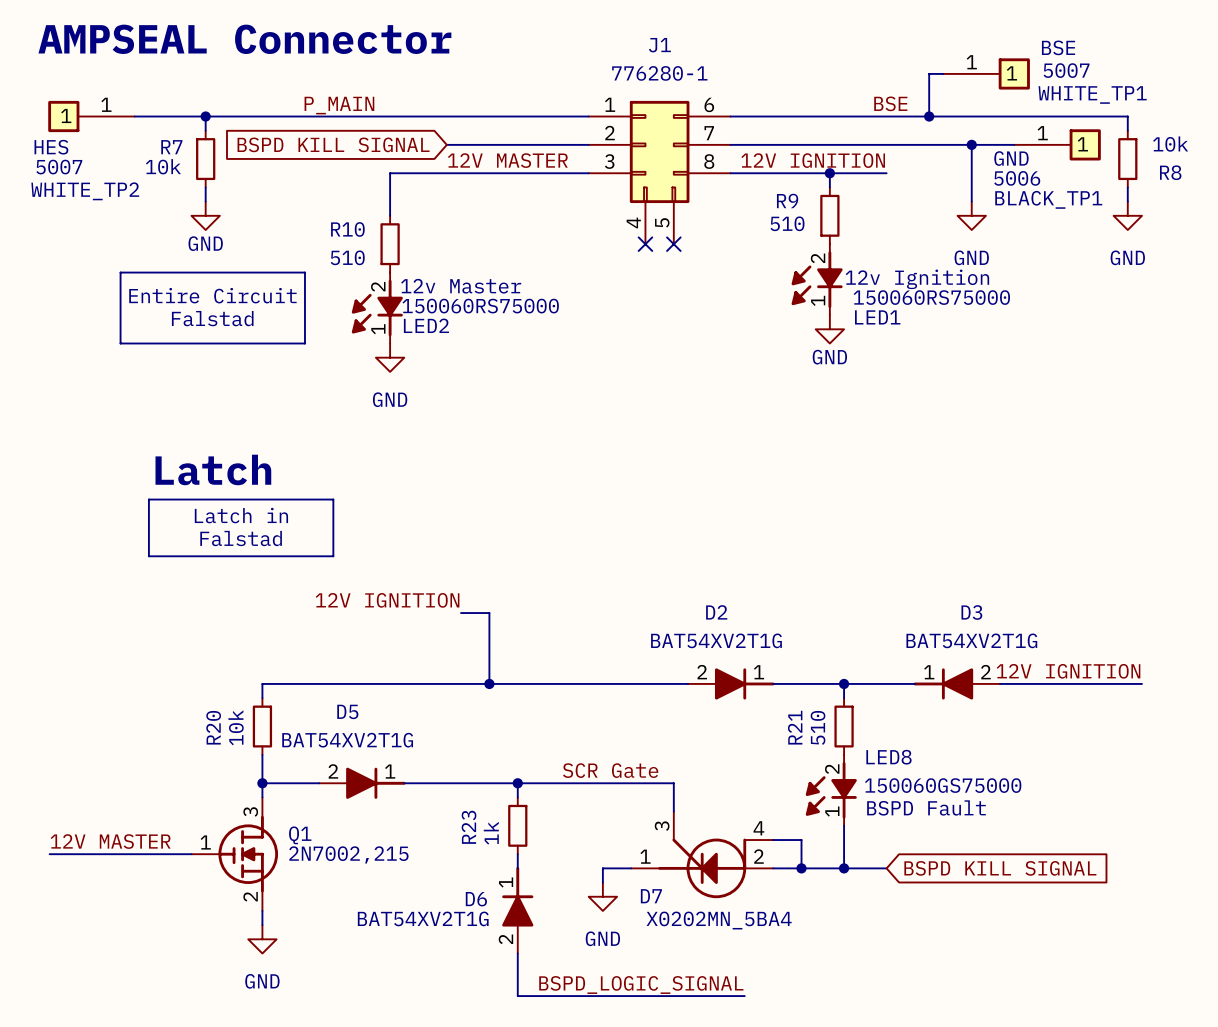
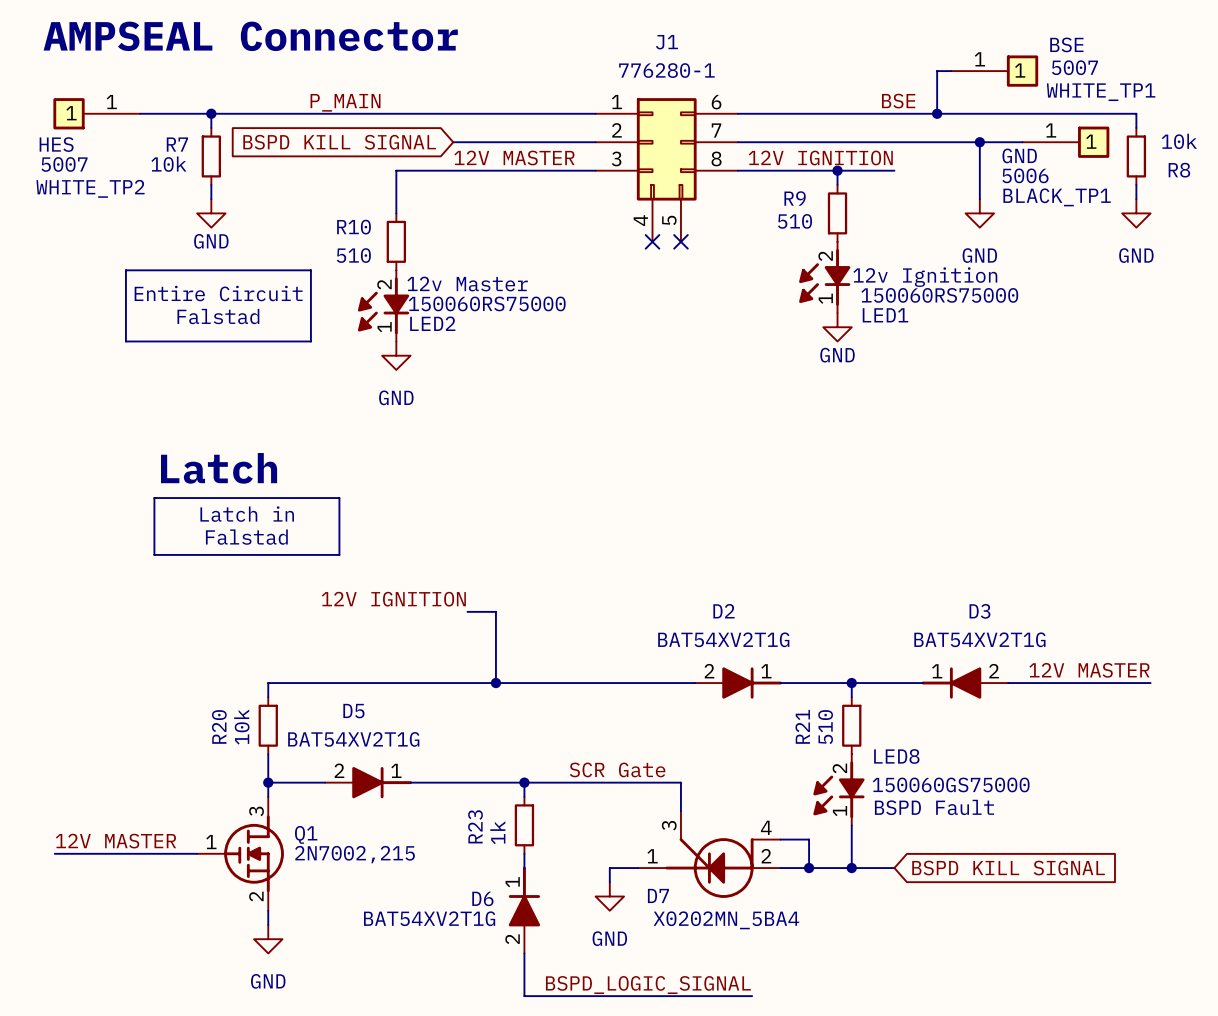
label: 12V IGNITION (1068, 671) -> 12V MASTER (1089, 670)

